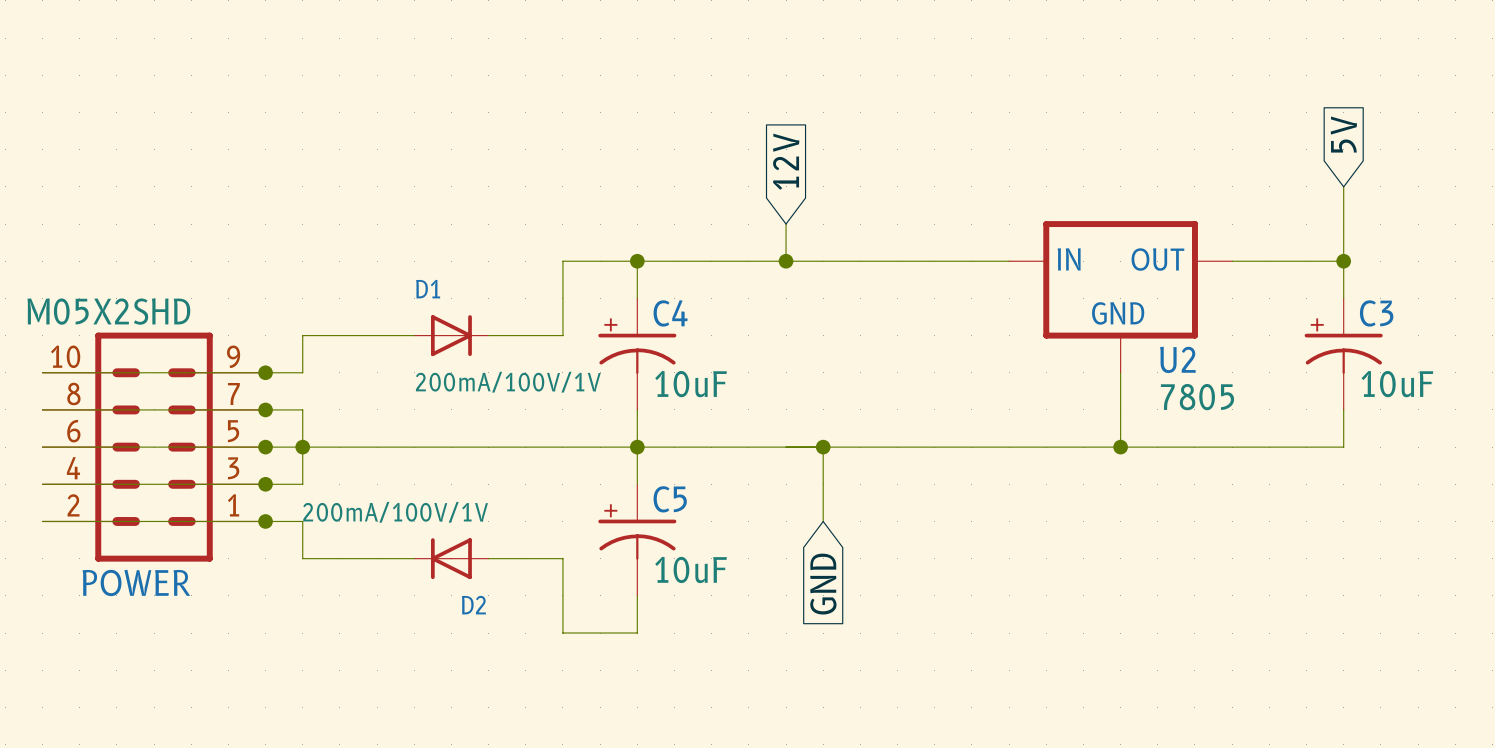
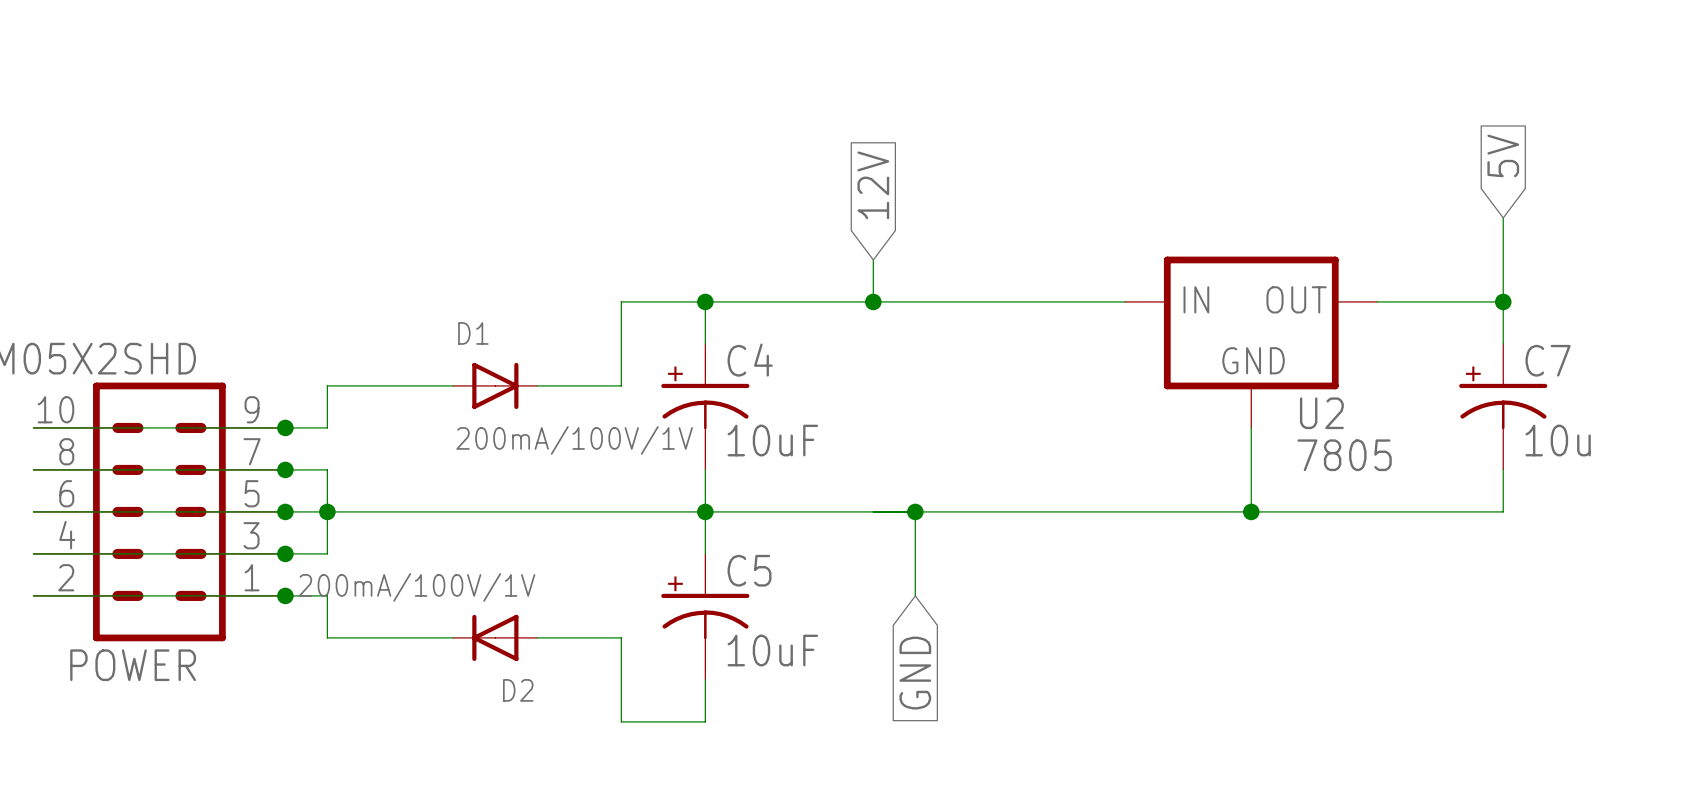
C3 name: C3 (1376, 313) -> C7 (1548, 360)
C3 value: 10uF (1397, 384) -> 10u (1558, 440)

